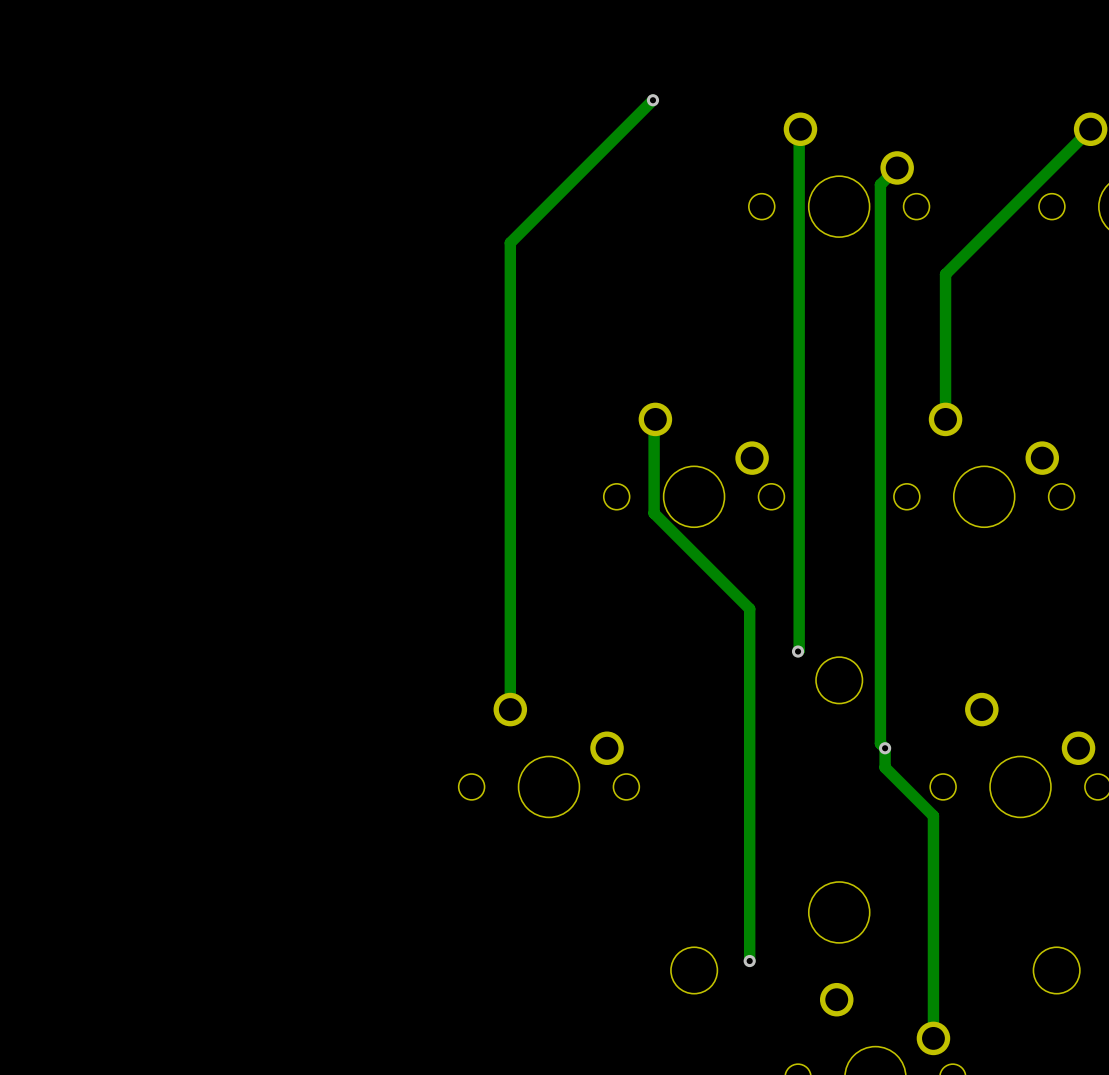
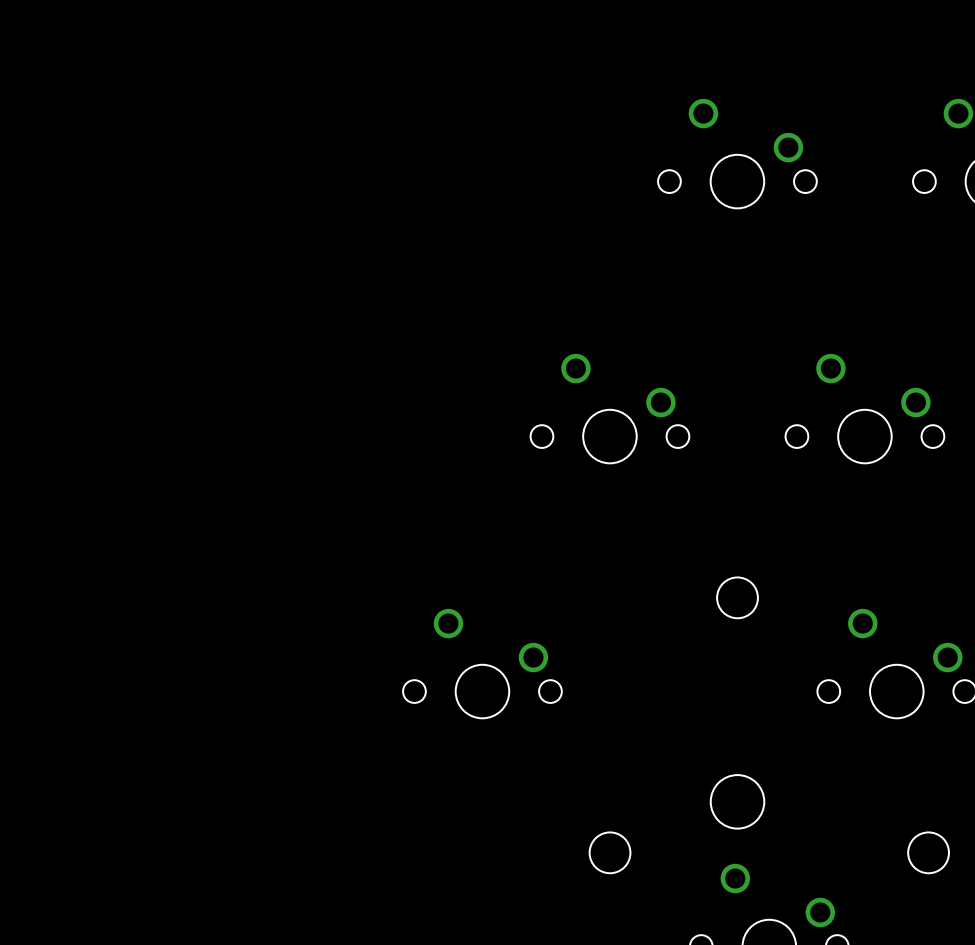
track: (652, 100) (510, 242) (510, 709) -> none
via: (652, 100) -> none
track: (800, 129) (798, 651) -> none
track: (1090, 129) (945, 274) (945, 419) -> none
track: (897, 167) (880, 184) (880, 743) (885, 748) (885, 767) (933, 815) (933, 1038) -> none
track: (655, 419) (654, 513) (749, 608) (749, 961) -> none
via: (798, 651) -> none
via: (885, 748) -> none
via: (749, 961) -> none

